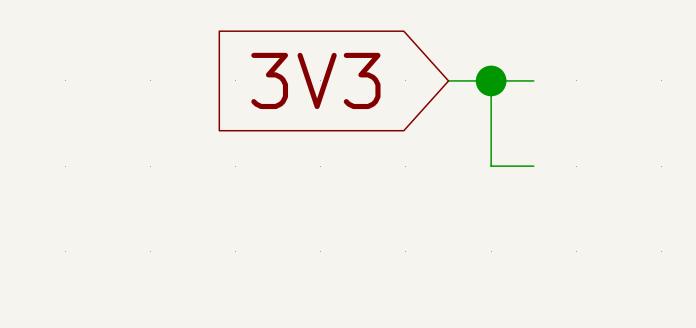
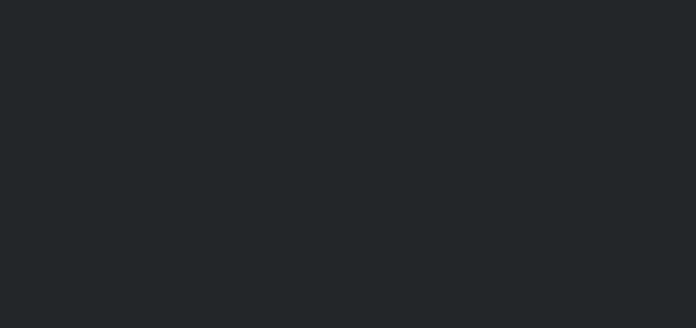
global label: 3V3 (315, 80) -> none
wire: (448, 80) (533, 80) -> none
wire: (491, 80) (491, 166) (533, 166) -> none
junction: (491, 80) -> none

